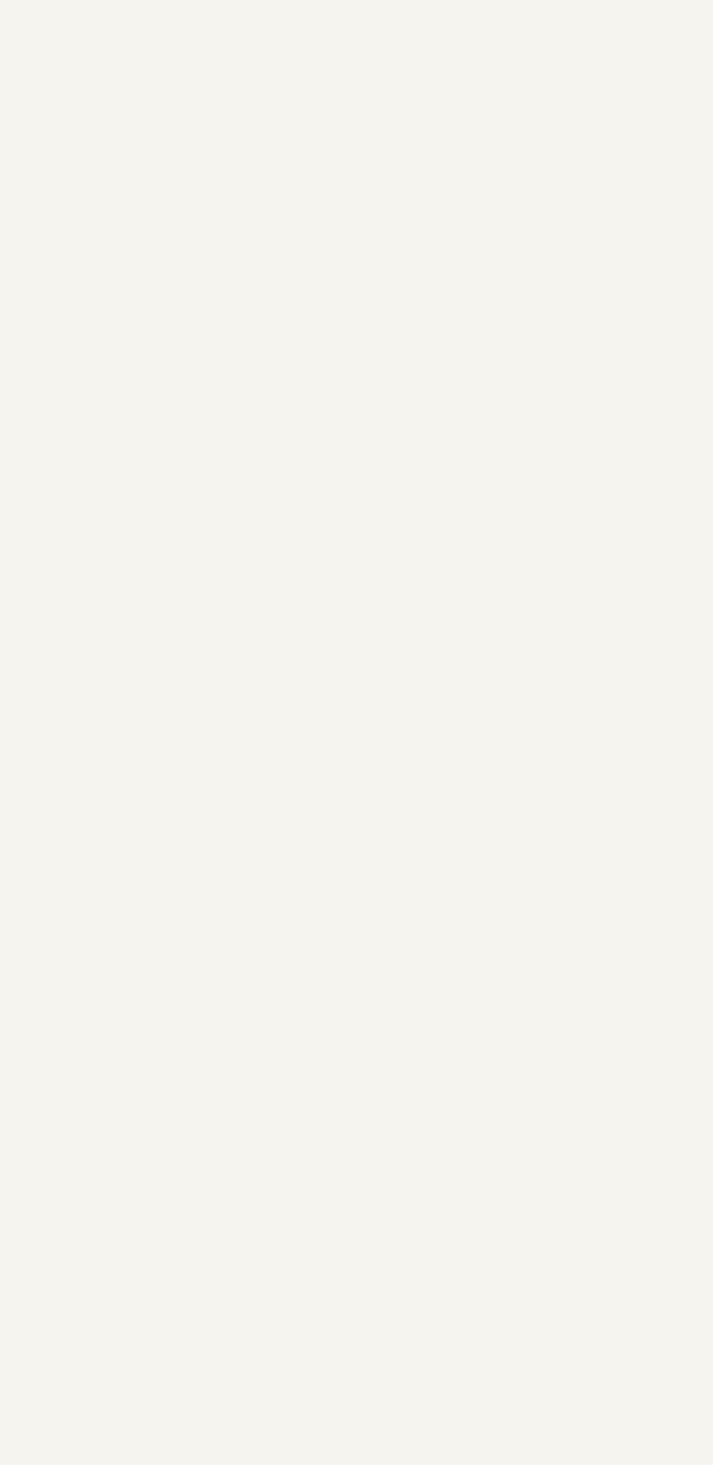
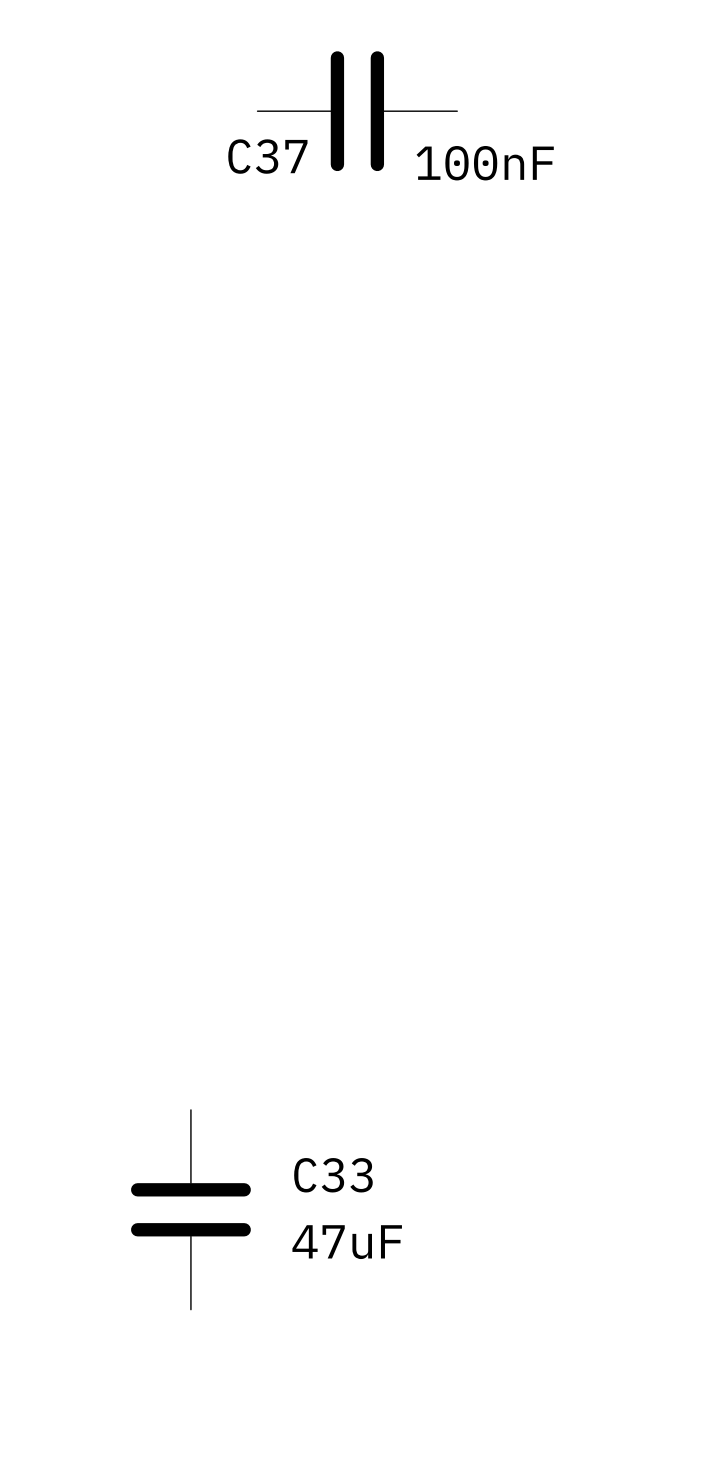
C37: none -> 100nF (357, 111)
C33: none -> 47uF (190, 1209)

